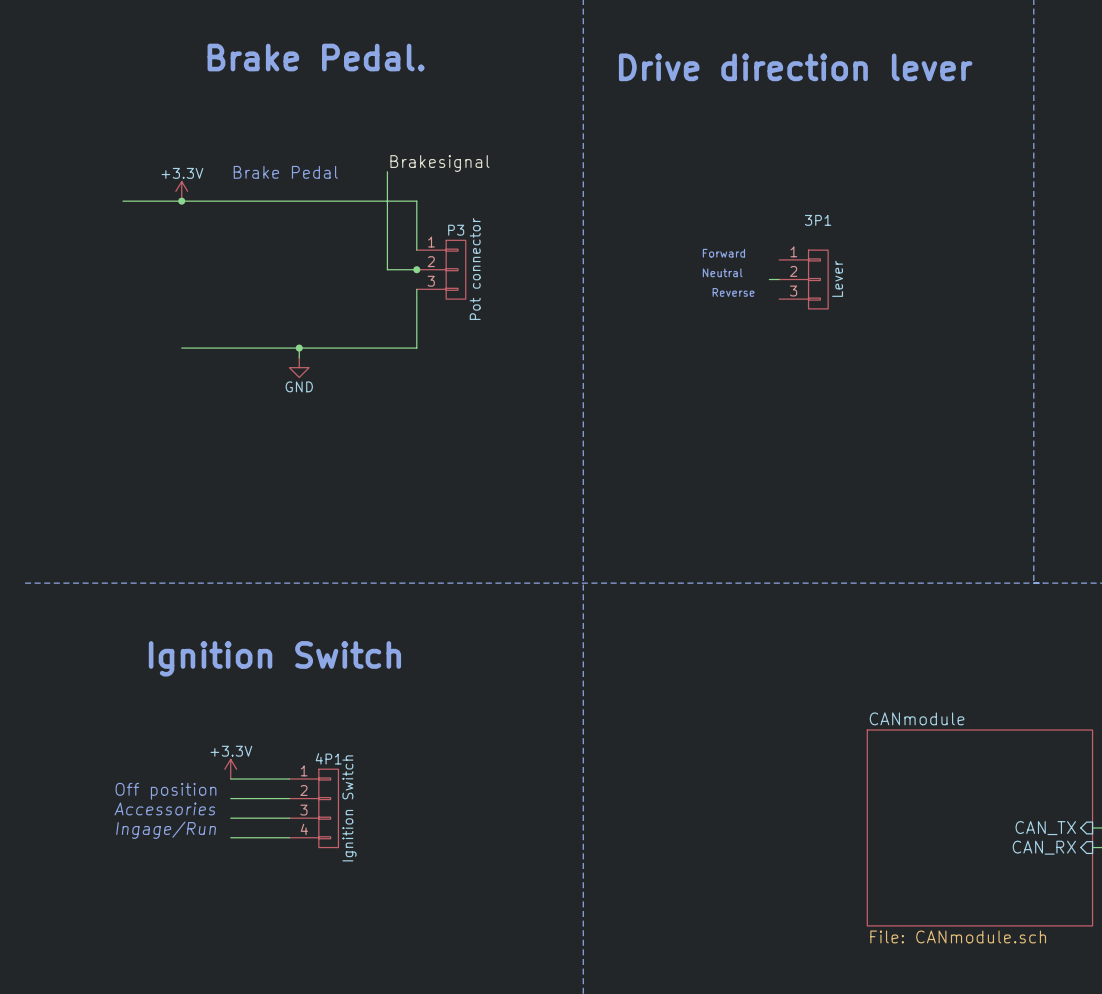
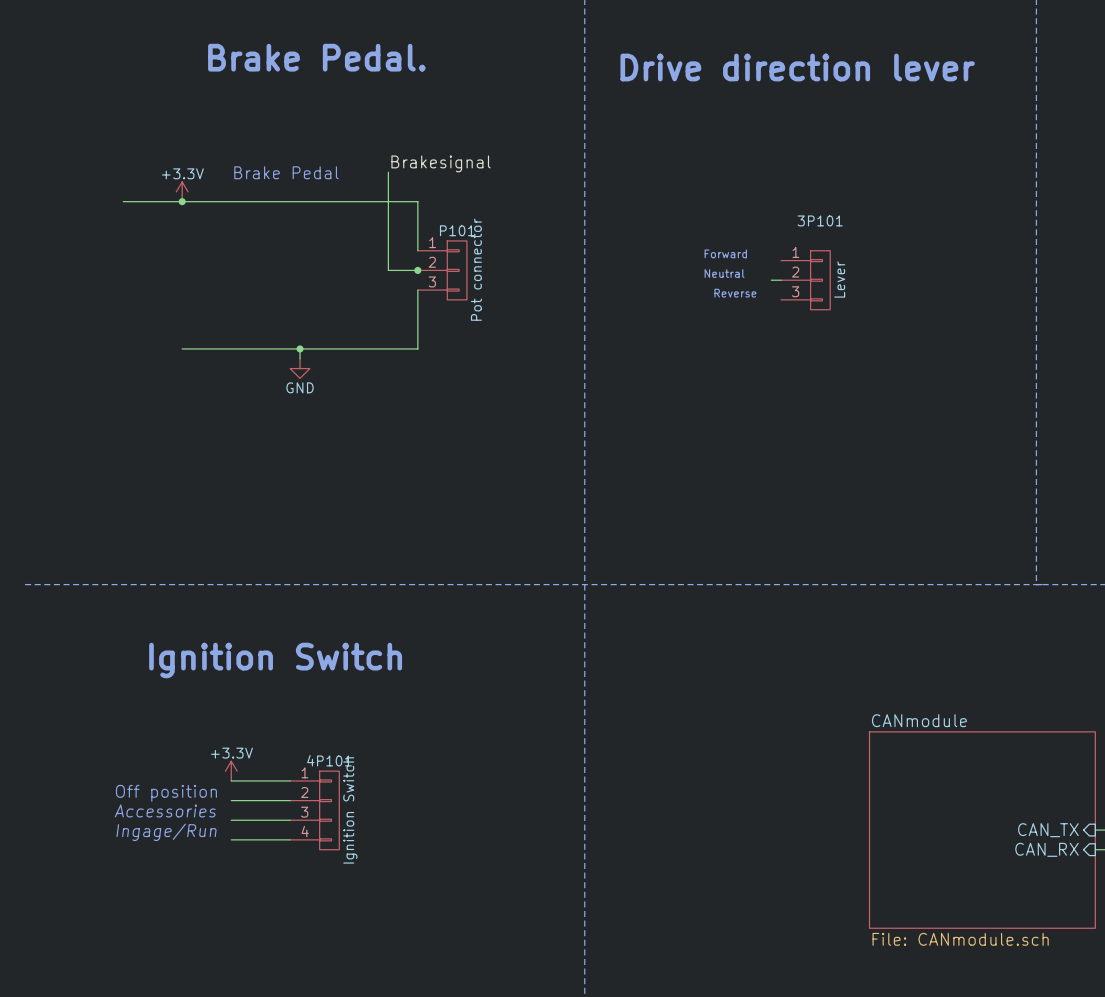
3P1 name: 3P1 (818, 220) -> 3P101 (820, 220)
P3 name: P3 (456, 230) -> P101 (457, 230)
4P1 name: 4P1 (328, 758) -> 4P101 (329, 760)

